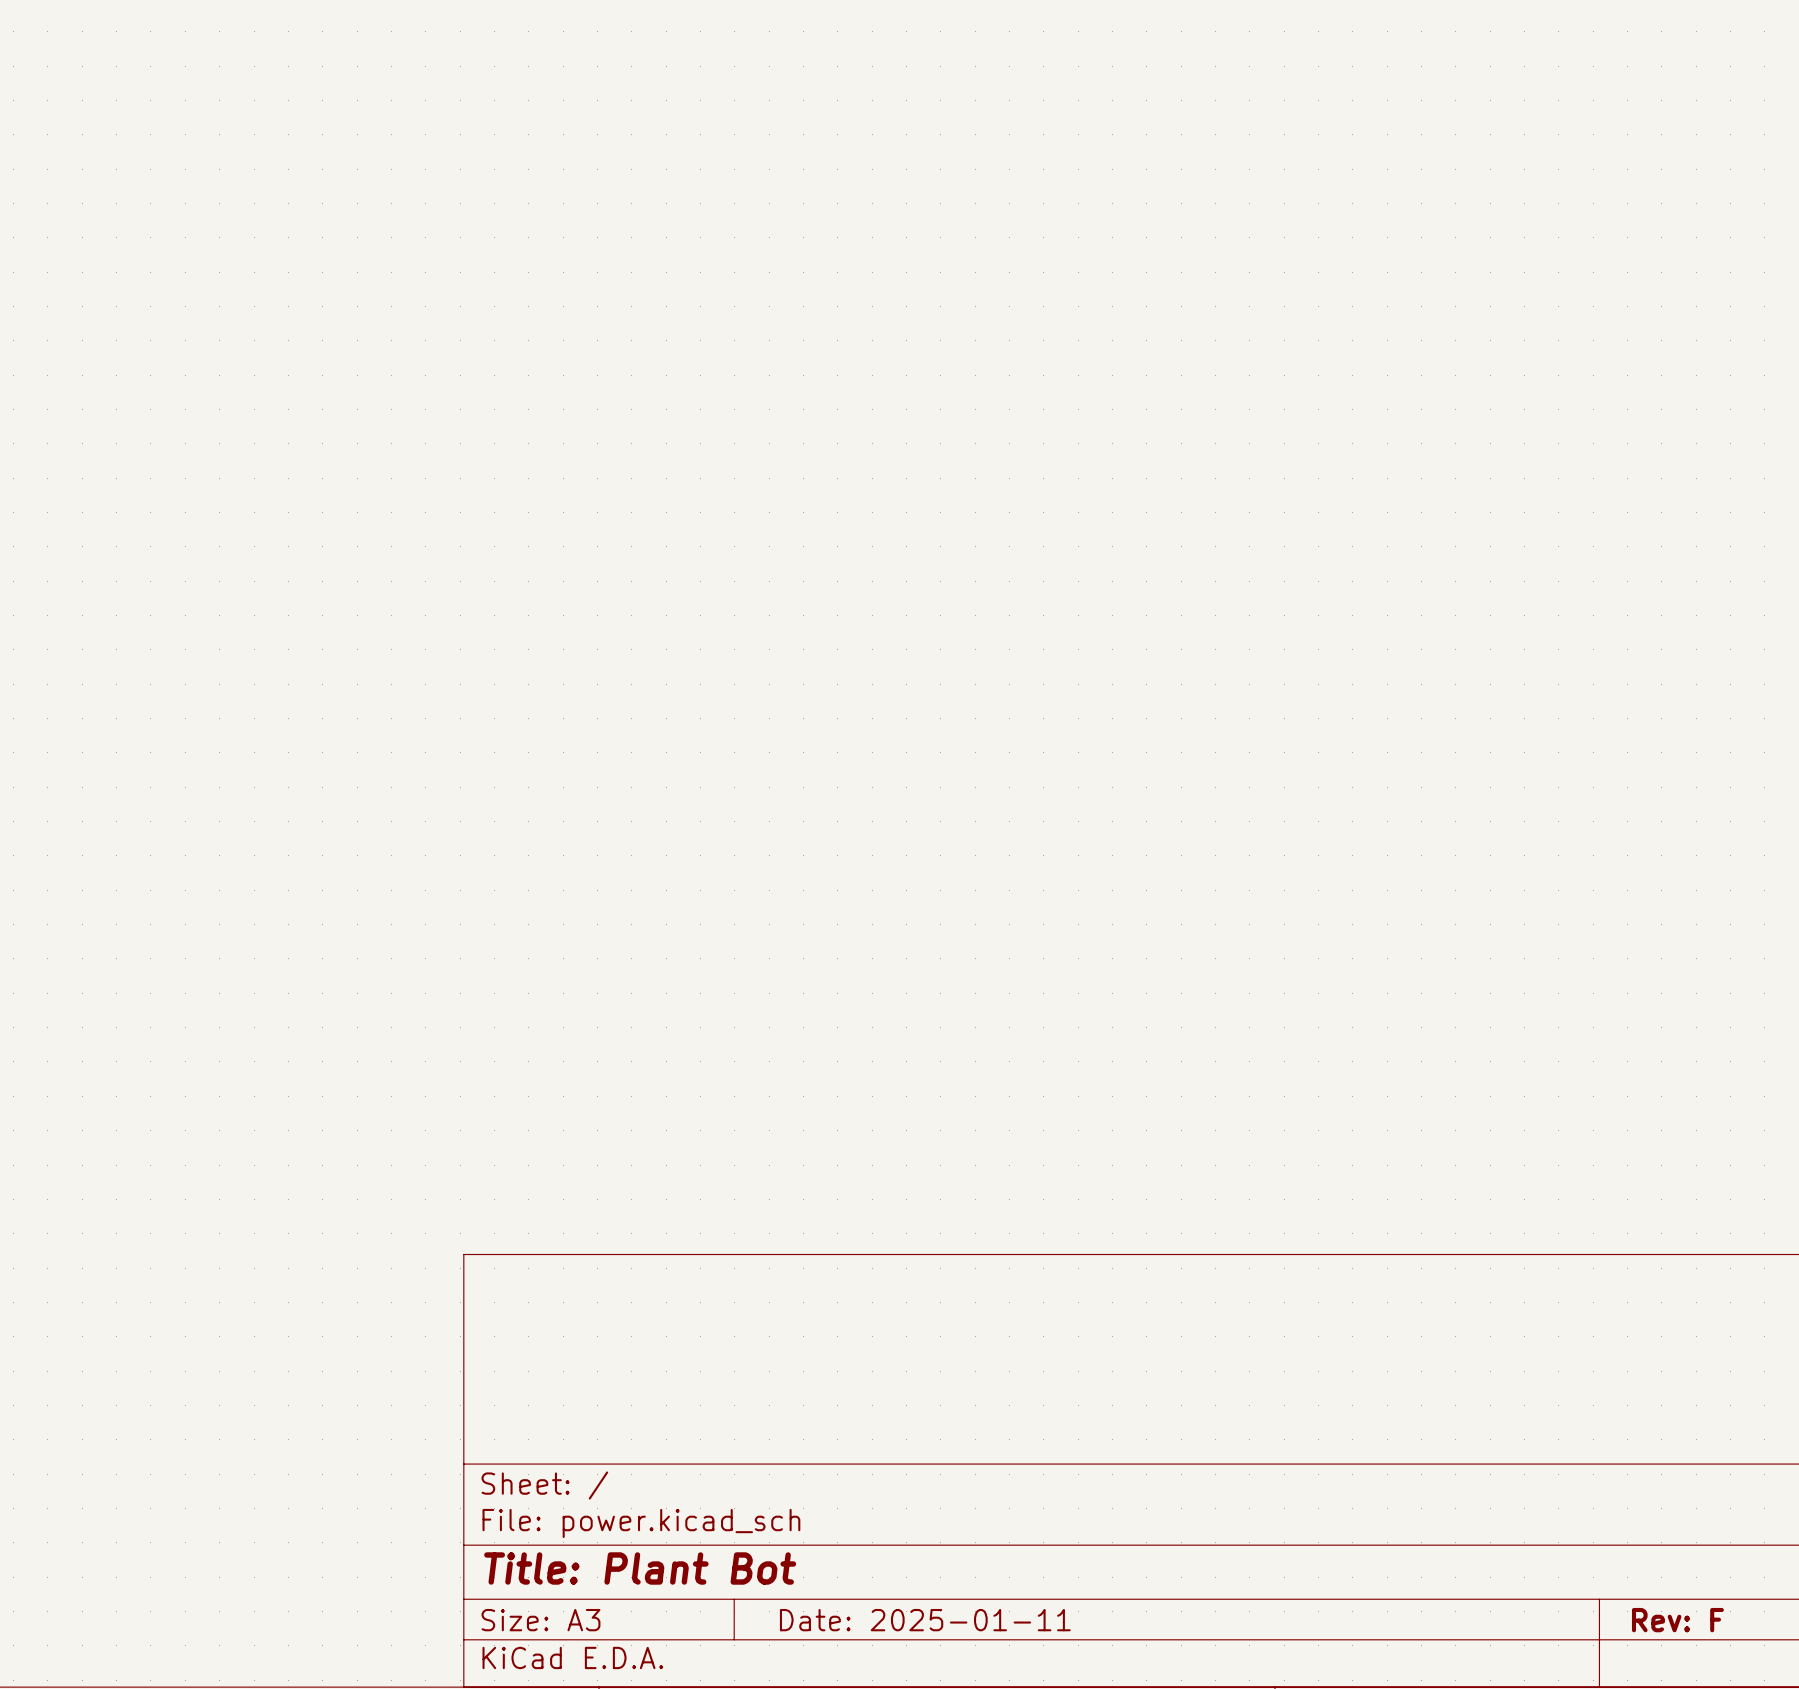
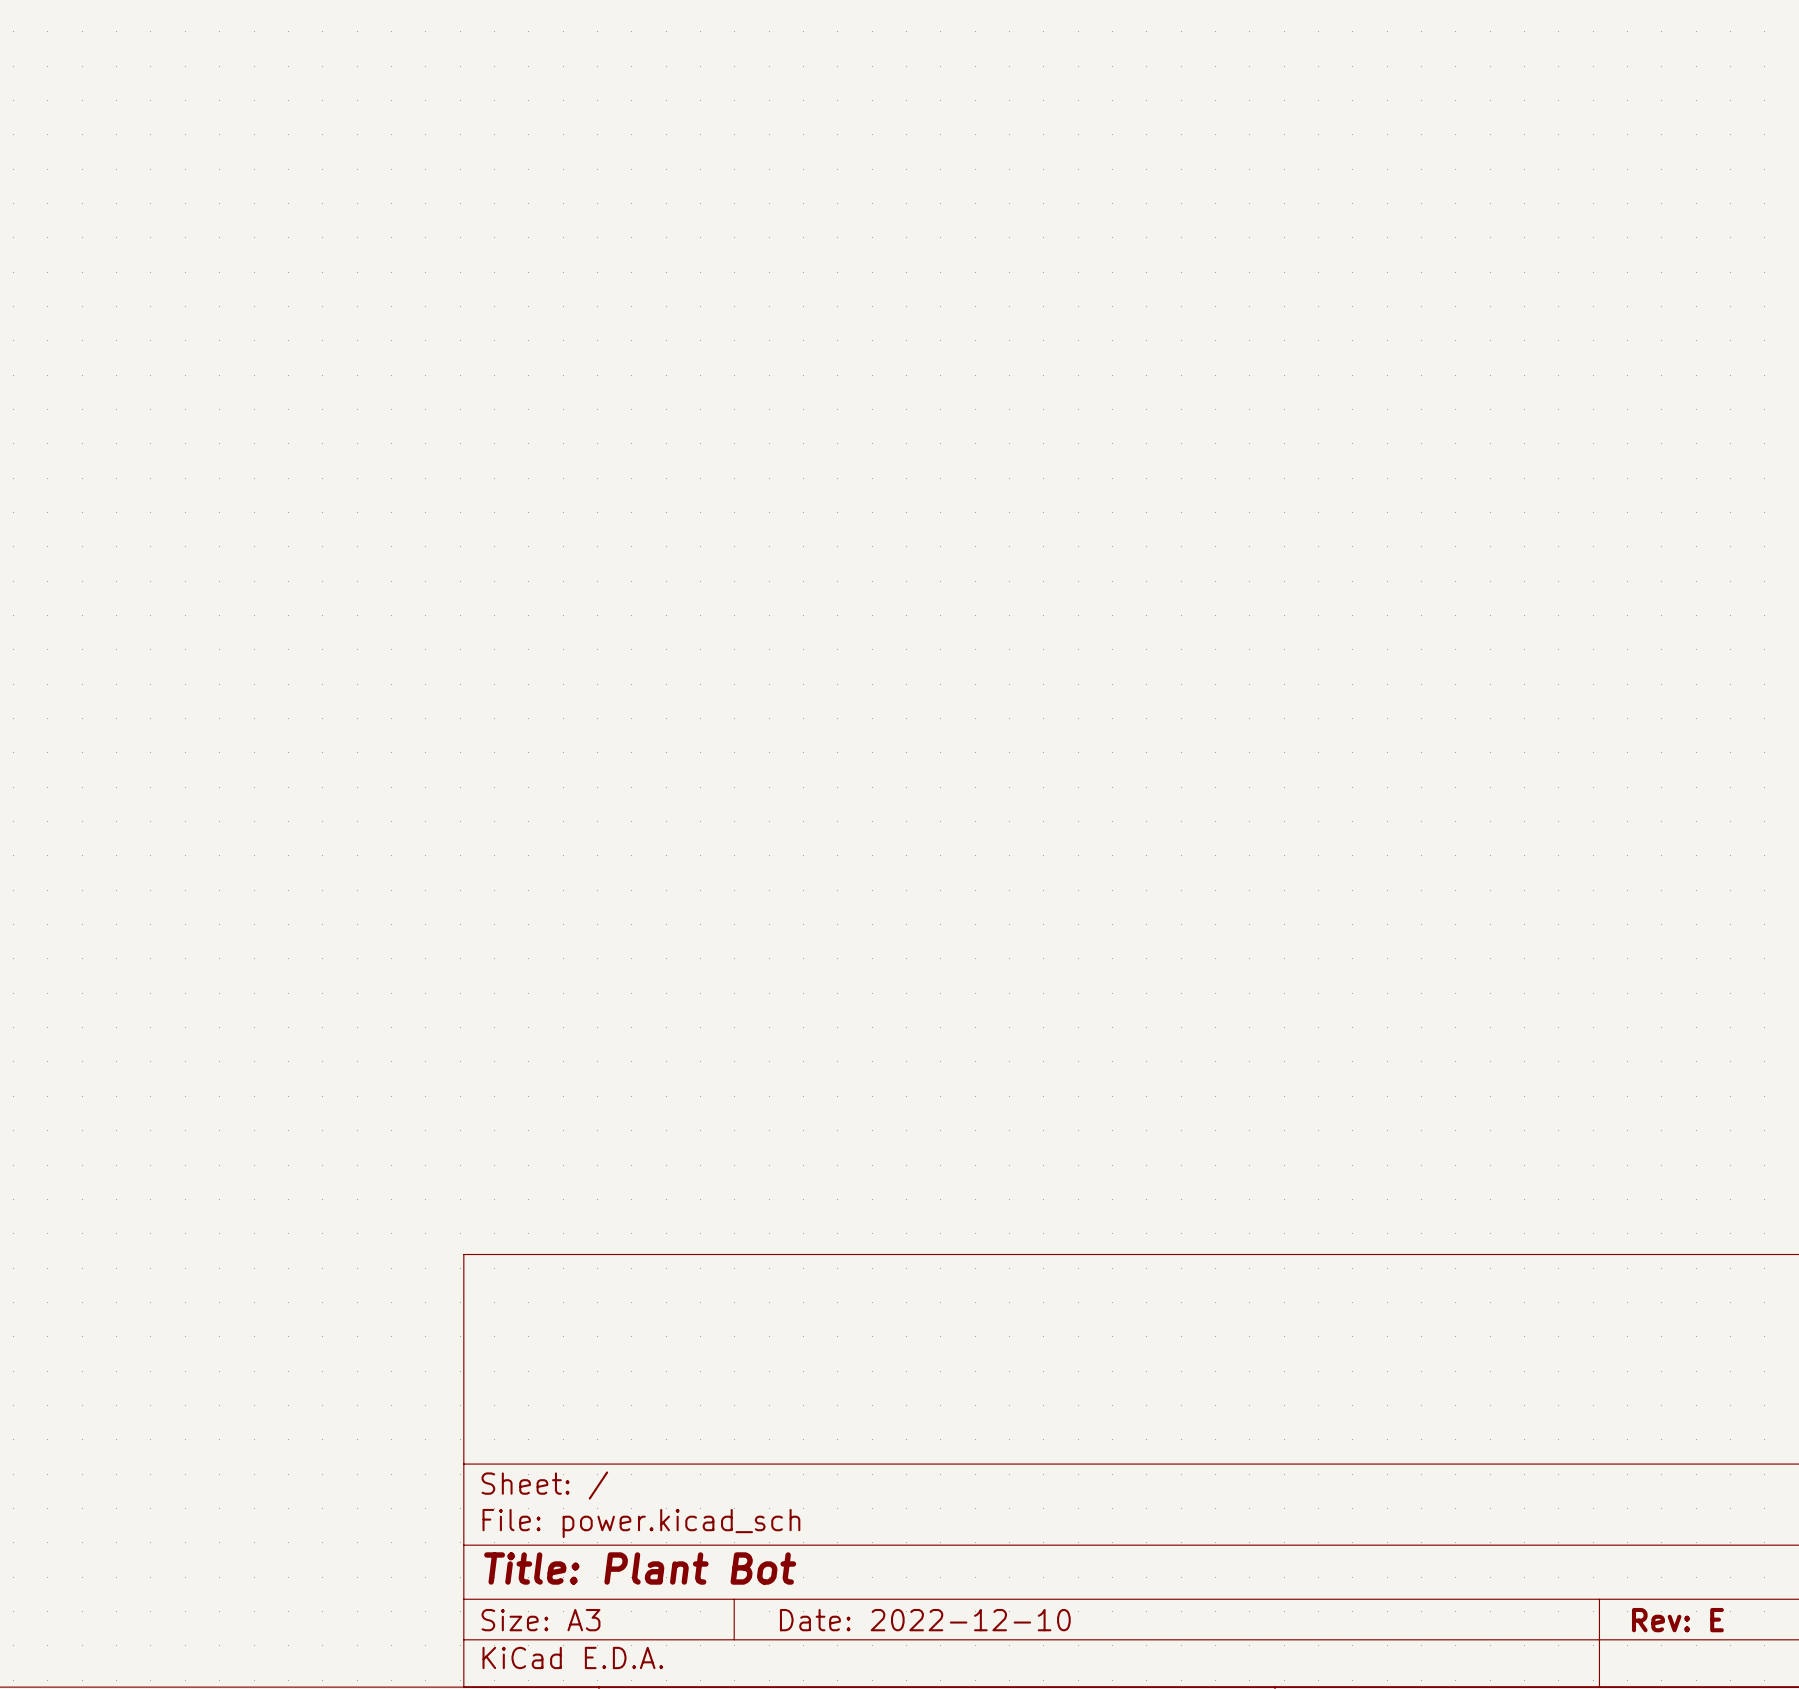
title block: Date: 2025-01-11 (925, 1620) -> Date: 2022-12-10 (925, 1620)
title block: Rev: F (1677, 1620) -> Rev: E (1677, 1620)

